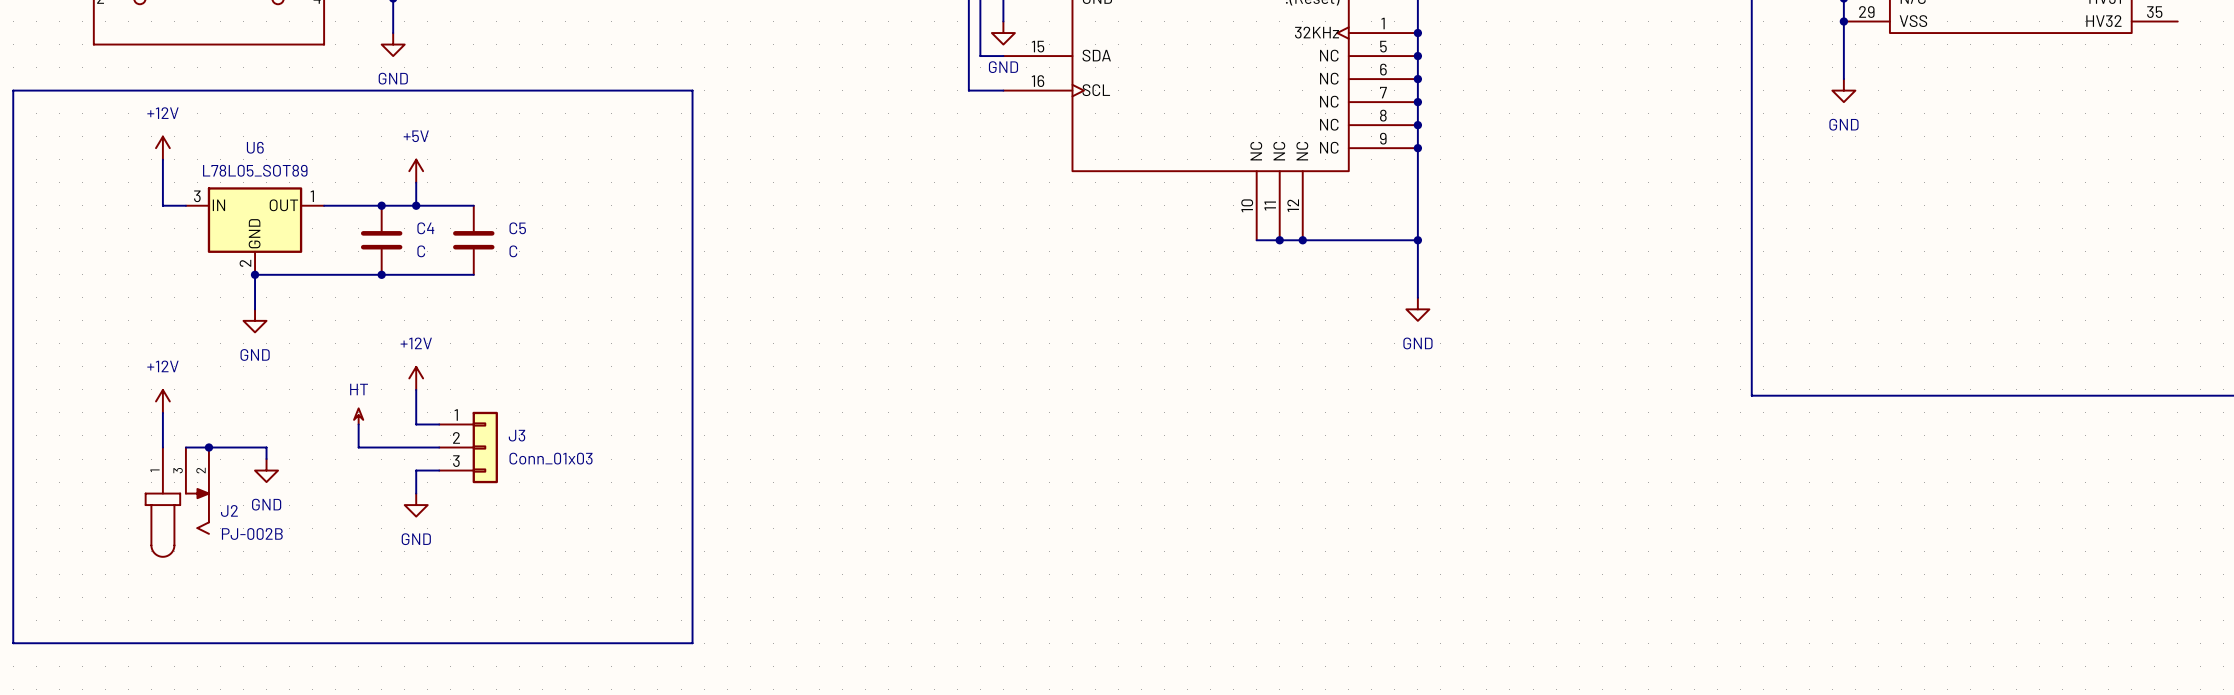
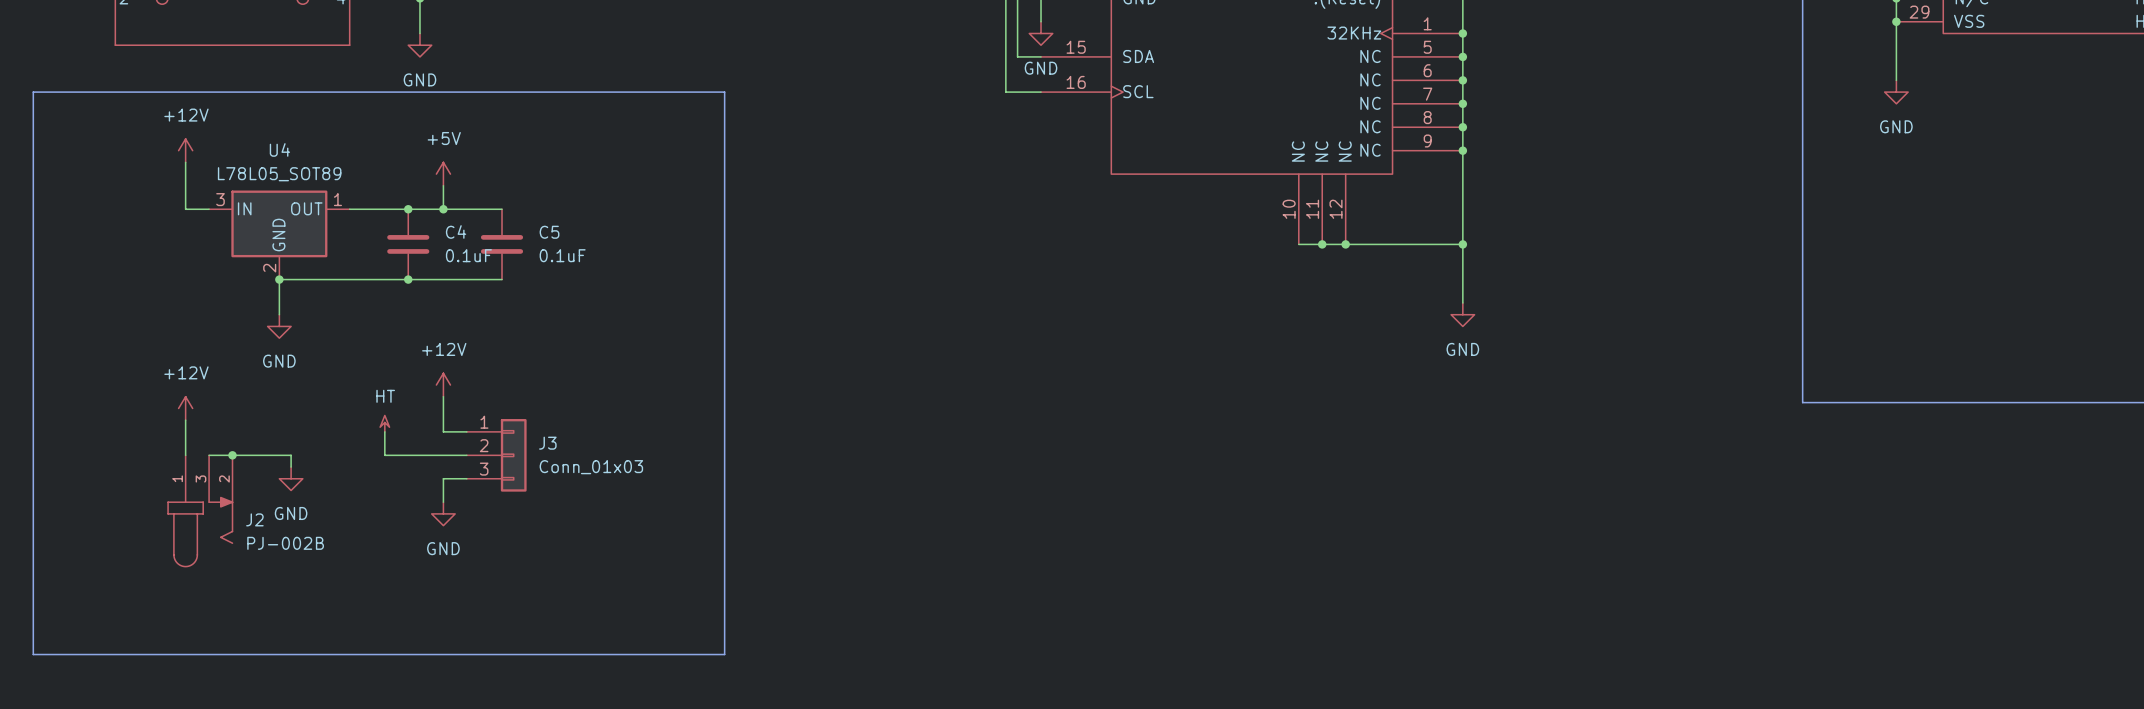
U6 name: U6 (255, 147) -> U4 (279, 149)
C4 value: C (421, 251) -> 0.1uF (468, 255)
C5 value: C (513, 251) -> 0.1uF (562, 255)

